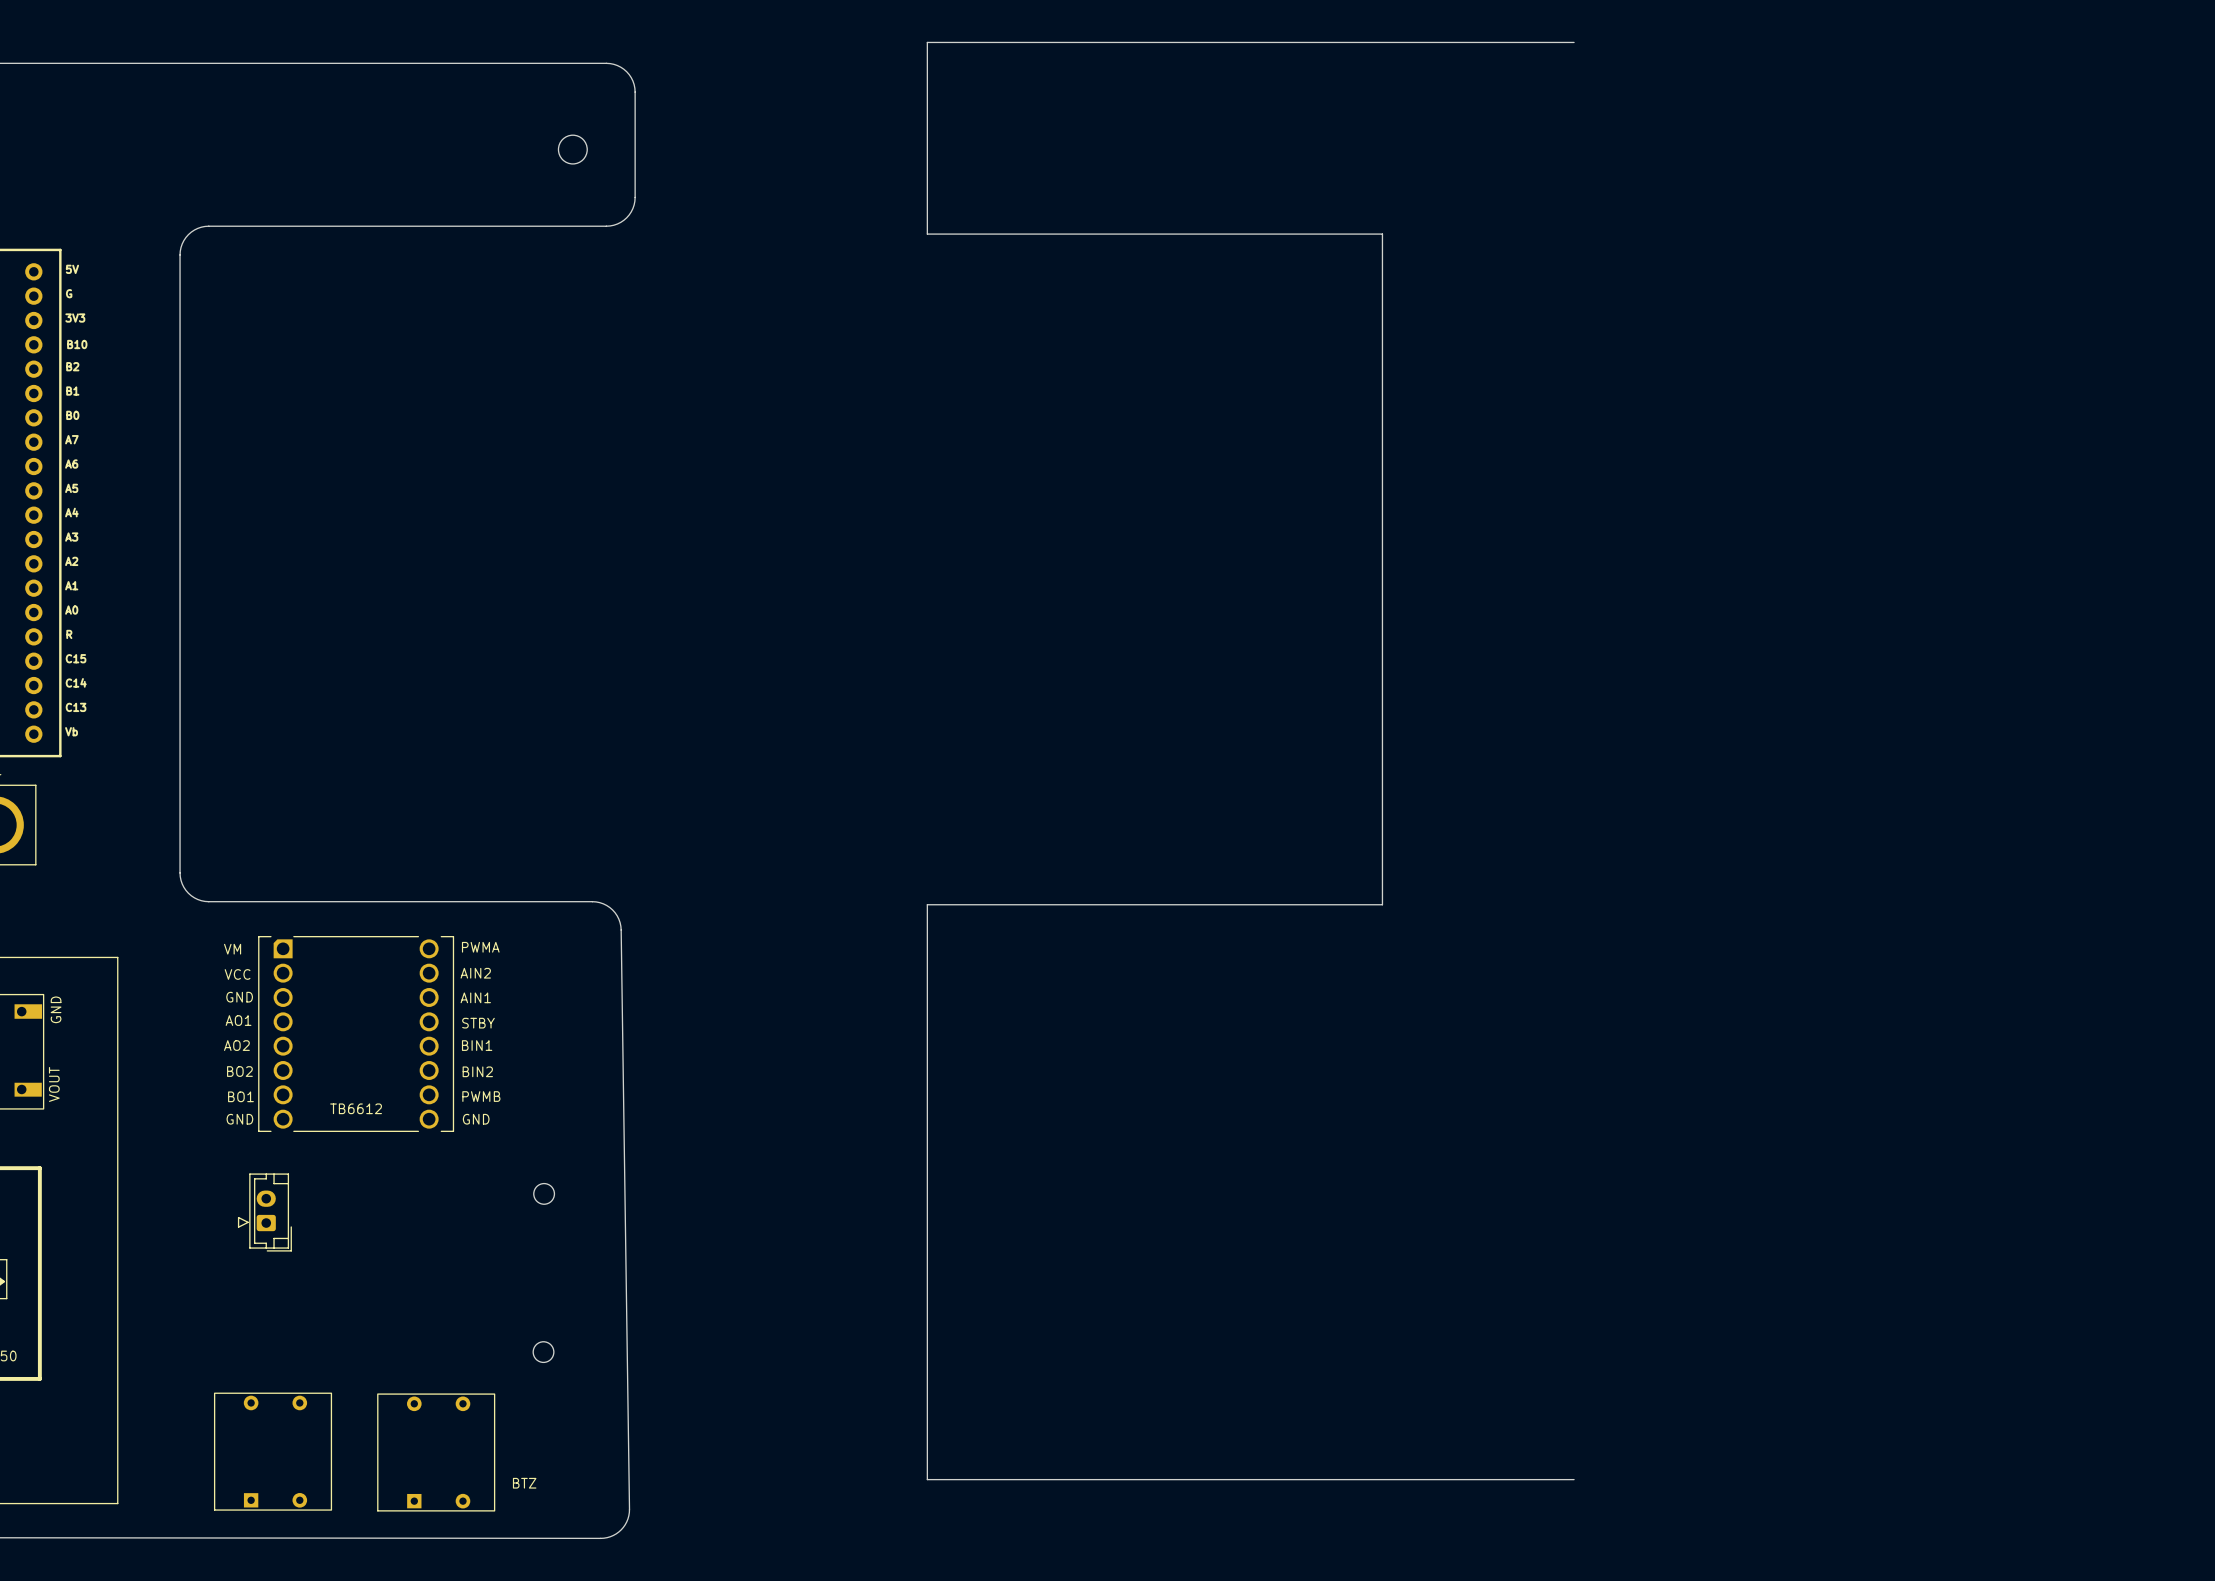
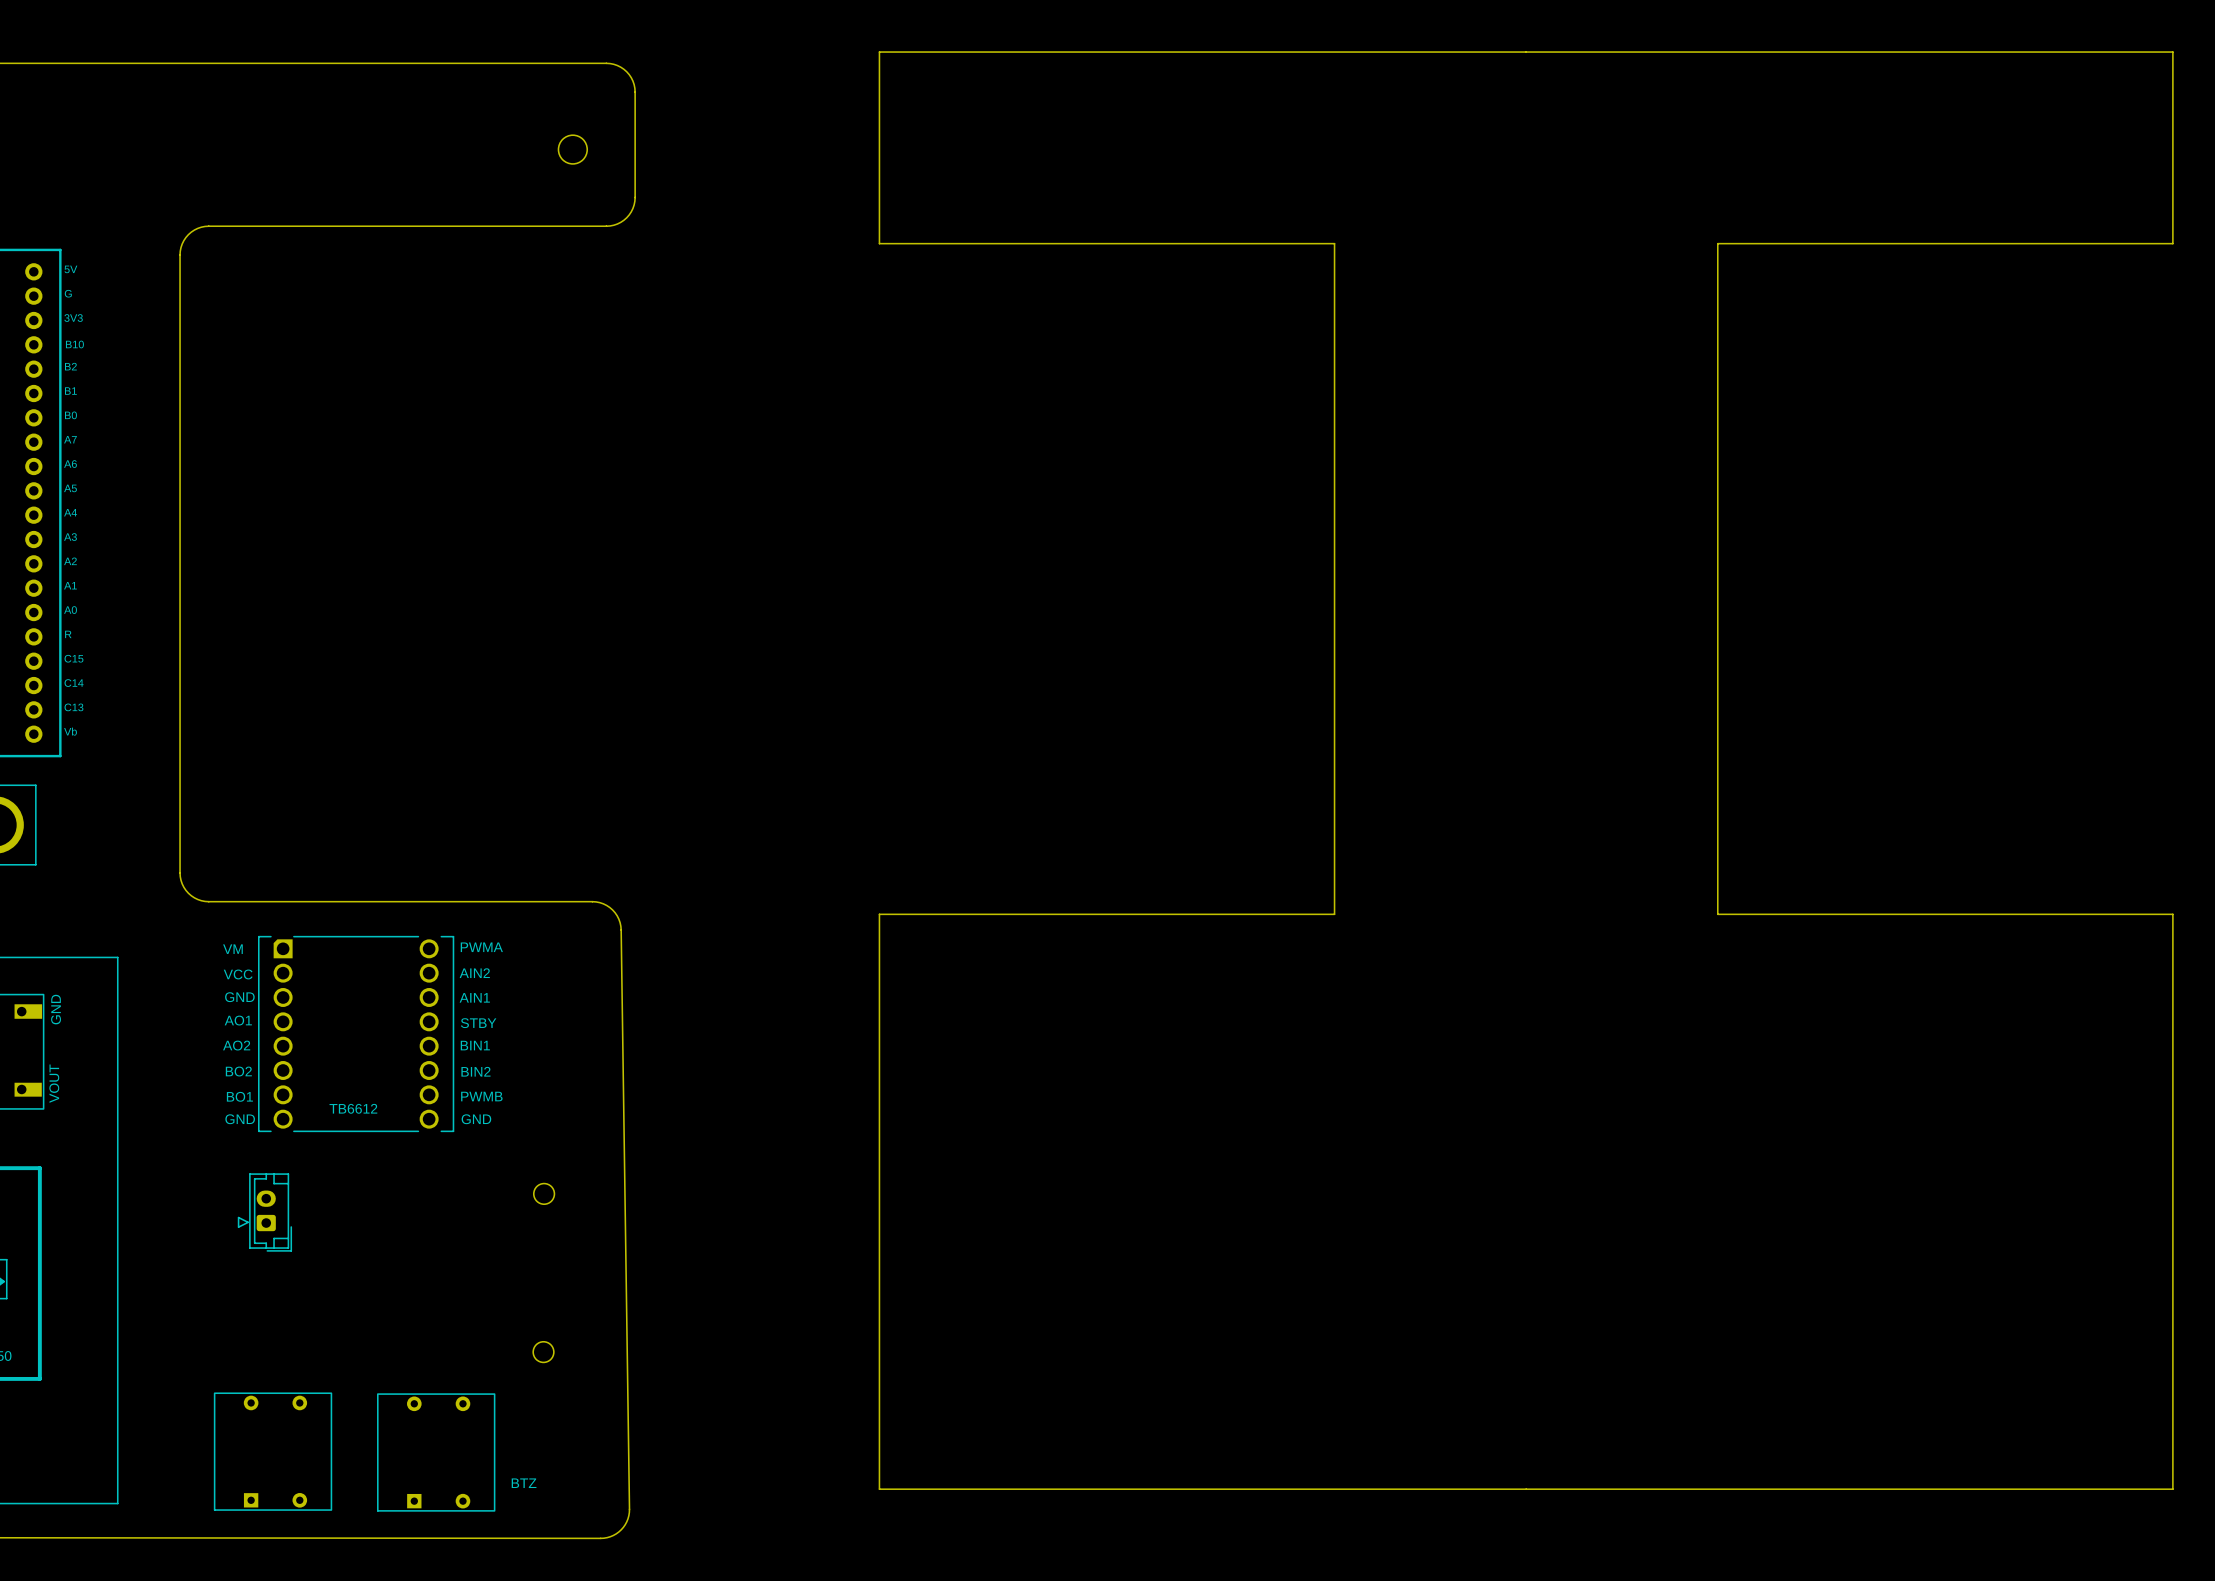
board edge: (1574, 42) (927, 42) (927, 234) (1382, 234) (1382, 904) (927, 904) (927, 1479) (1574, 1479) -> none
board edge: none -> (879, 52) (2172, 52) (2172, 243) (1717, 243) (1717, 914) (2172, 914) (2172, 1489) (879, 1489) (879, 914) (1334, 914) (1334, 243) (879, 243) (879, 52)

